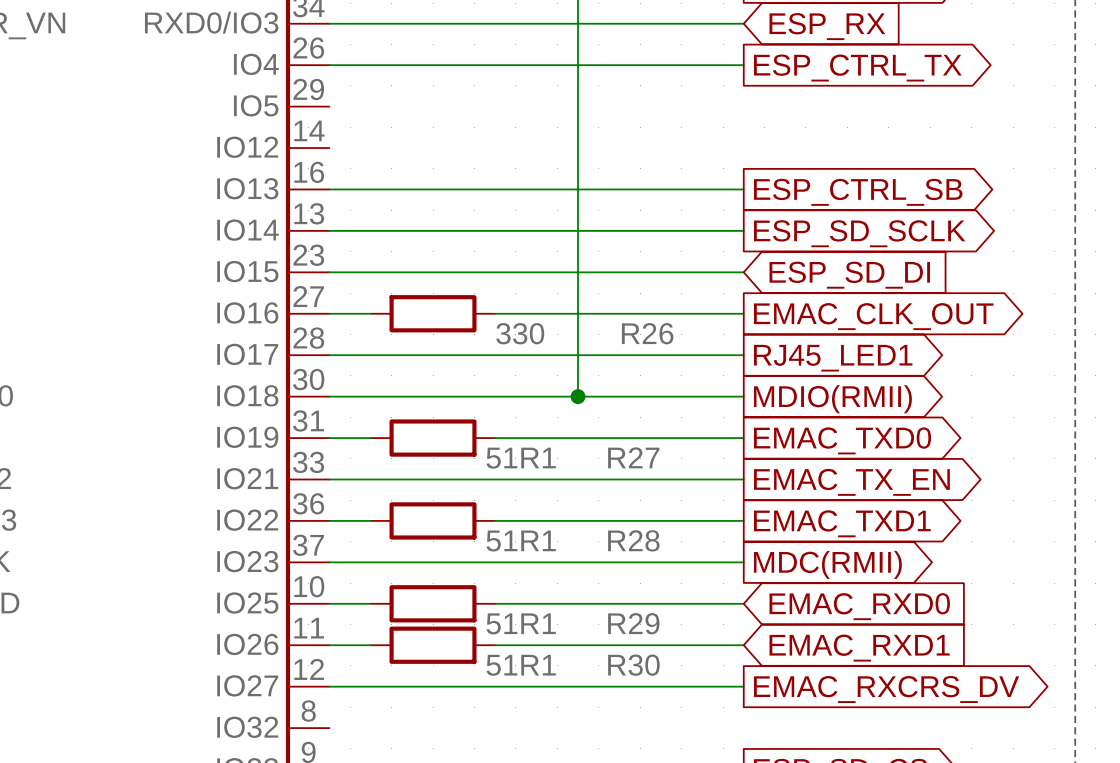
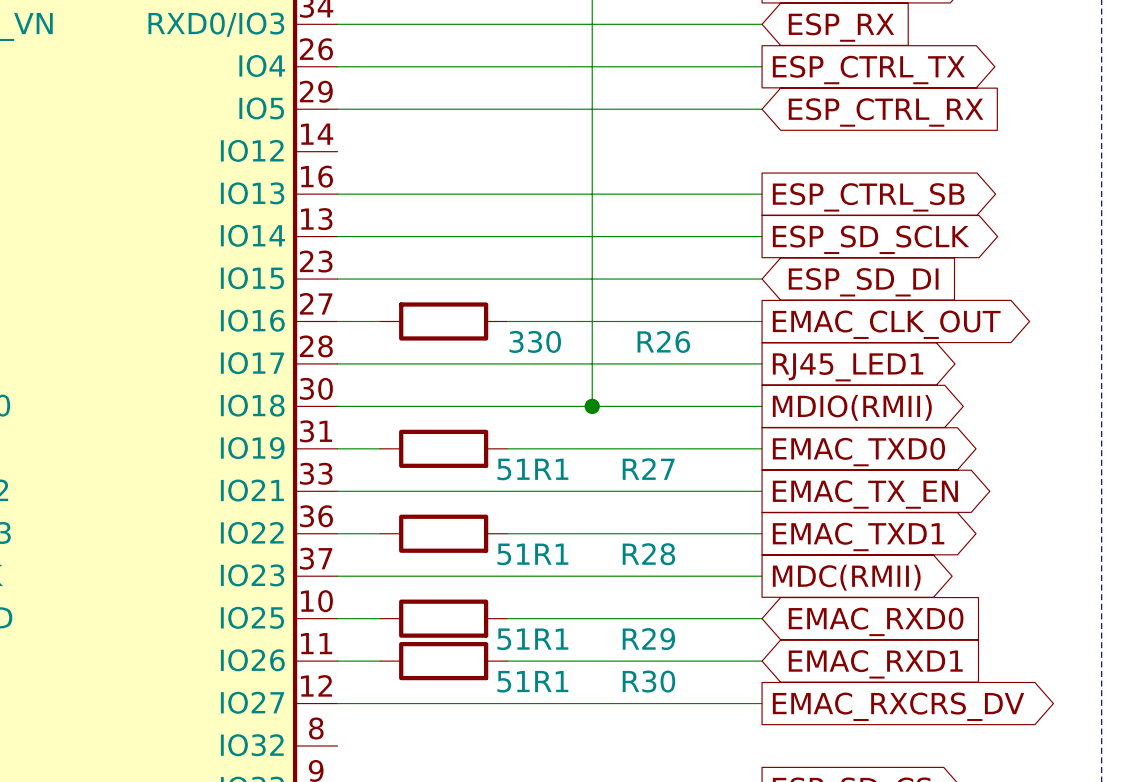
wire: none -> (337, 109) (762, 109)
global label: none -> ESP_CTRL_RX (886, 112)

